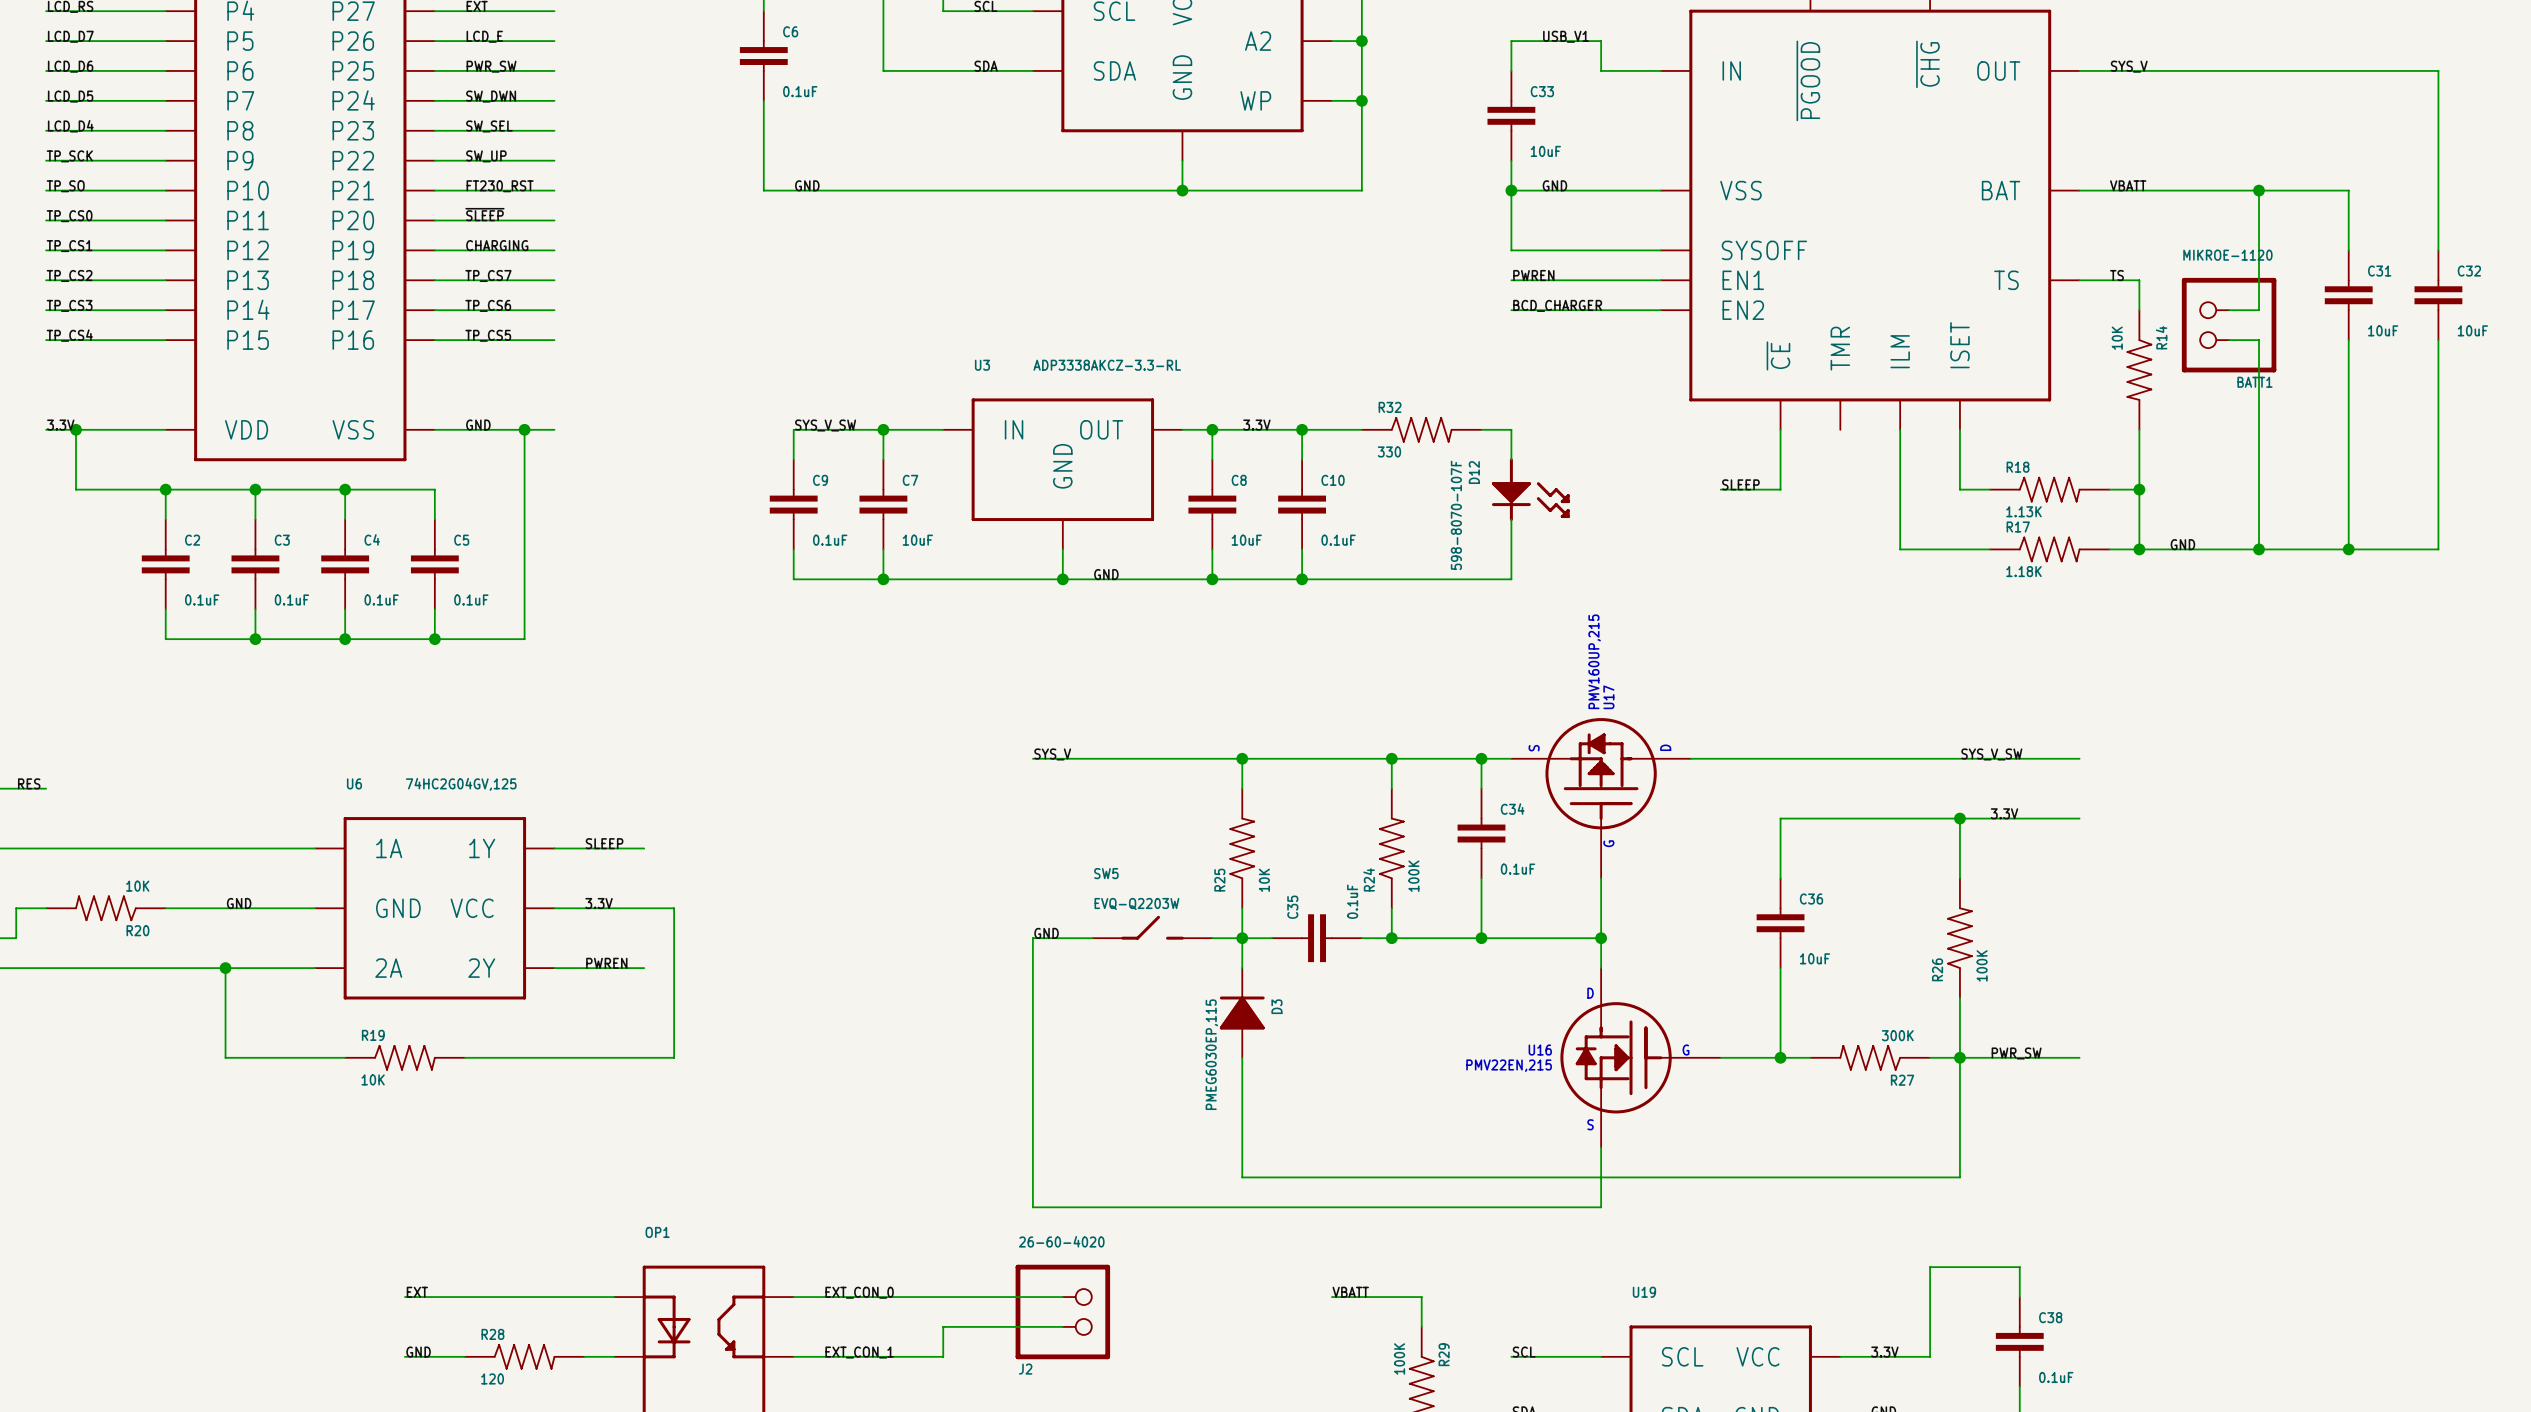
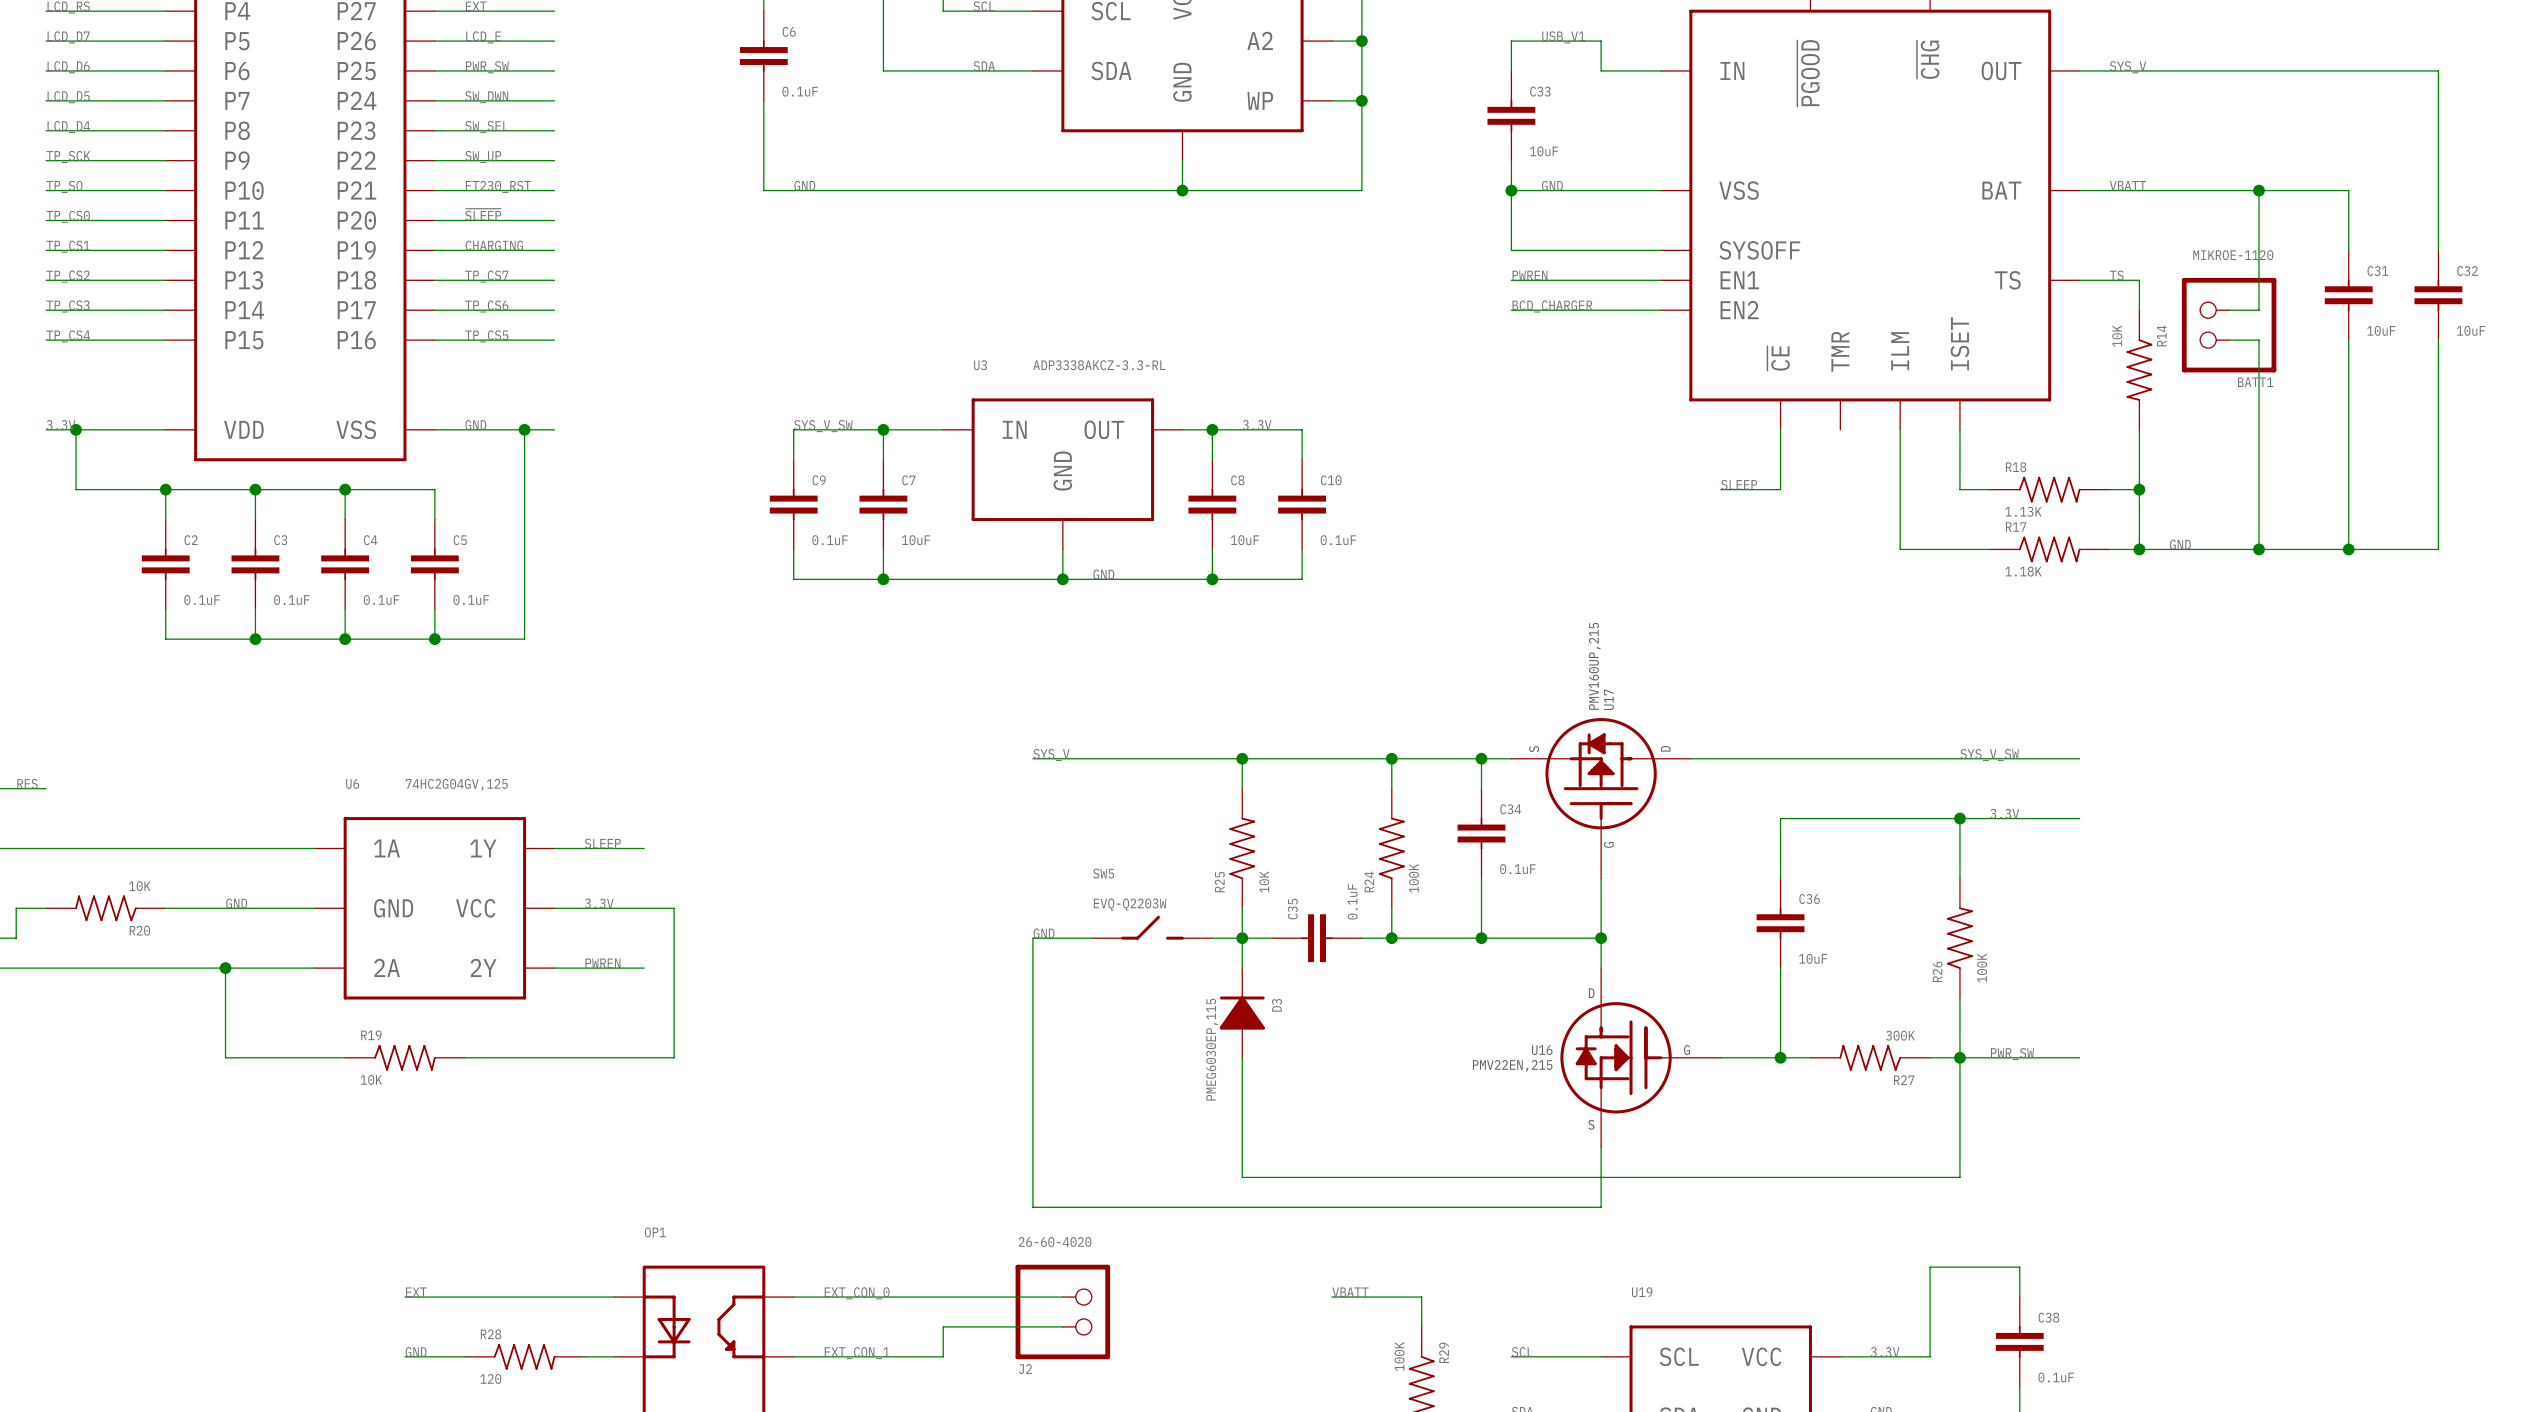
wire: (1302, 429) (1361, 429) -> none
junction: (1302, 429) -> none
R32: 330 (1421, 429) -> none
wire: (1481, 429) (1511, 429) (1511, 459) -> none
D12: 598-8070-107F (1530, 489) -> none
wire: (1511, 519) (1511, 579) (1302, 579) -> none
junction: (1302, 579) -> none

